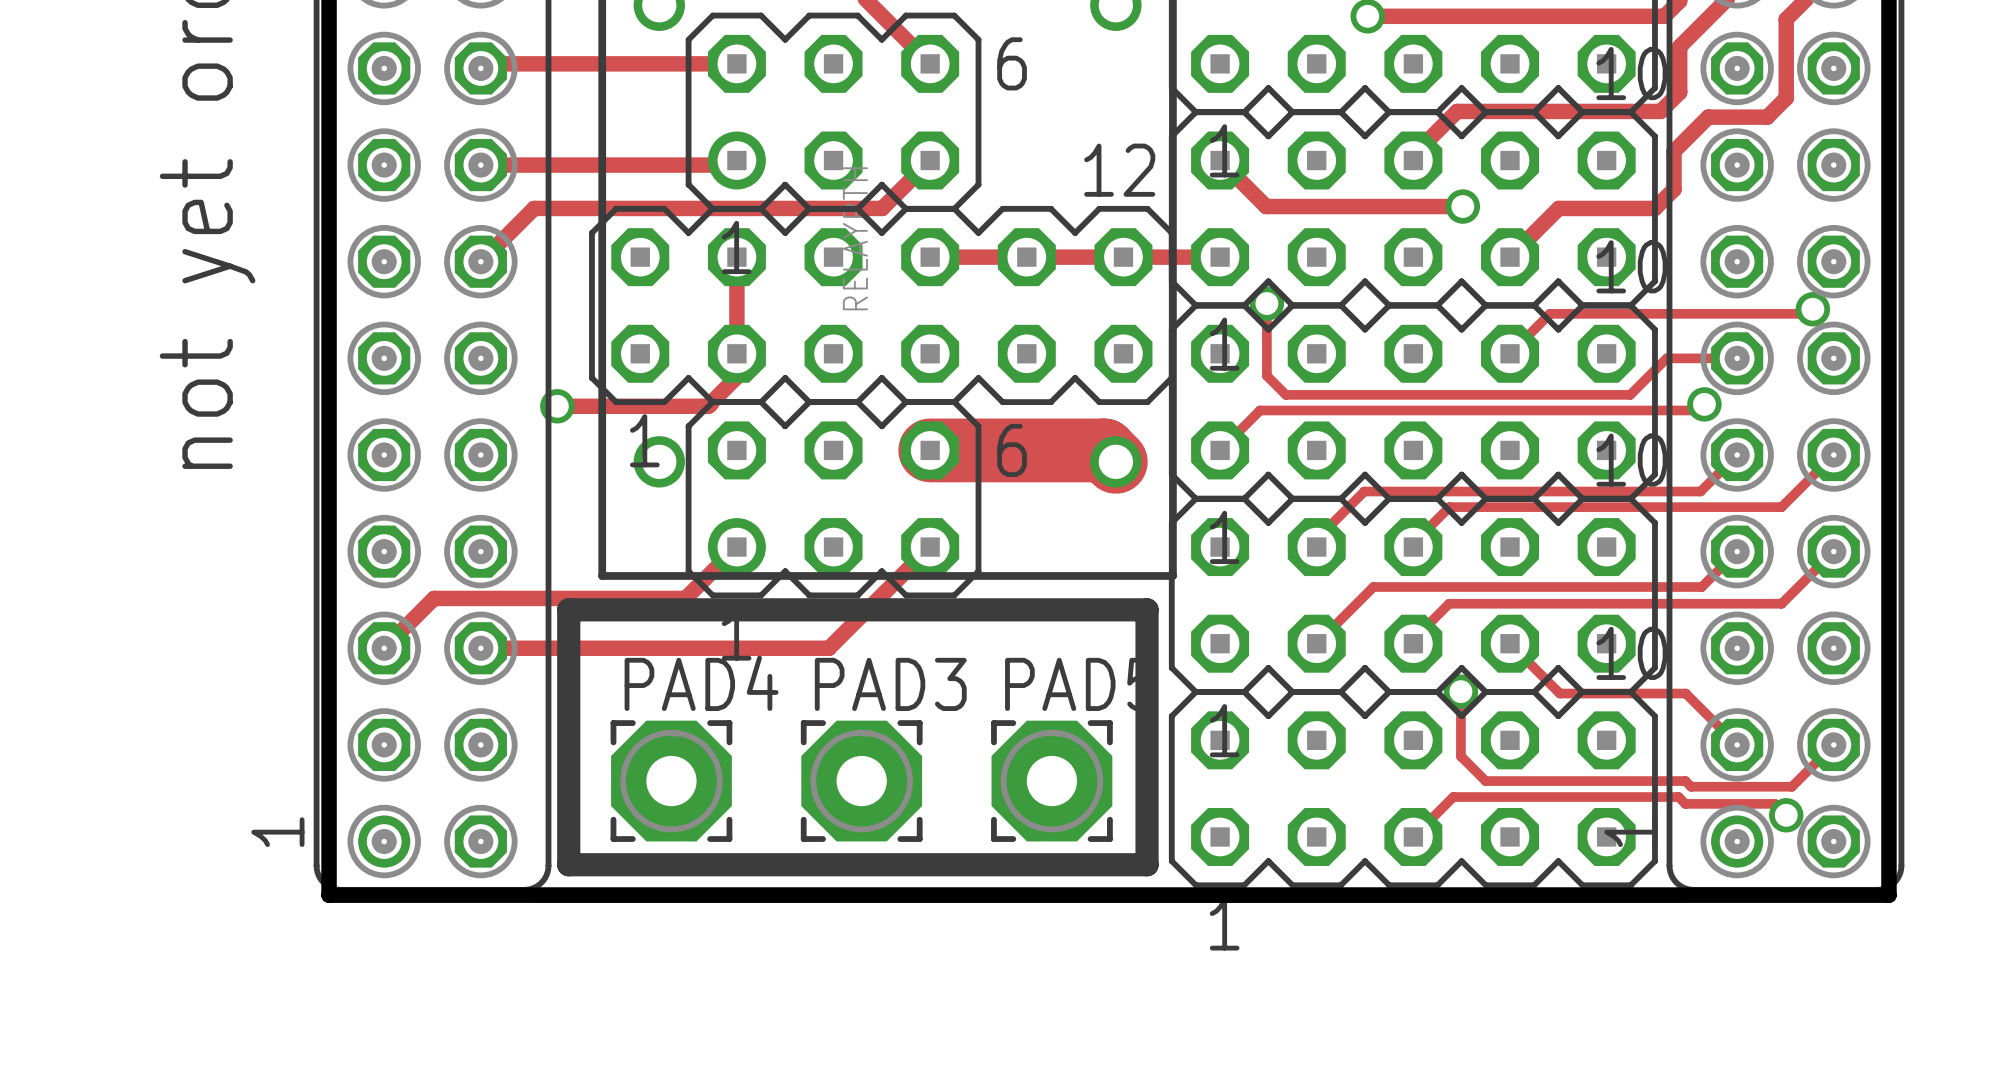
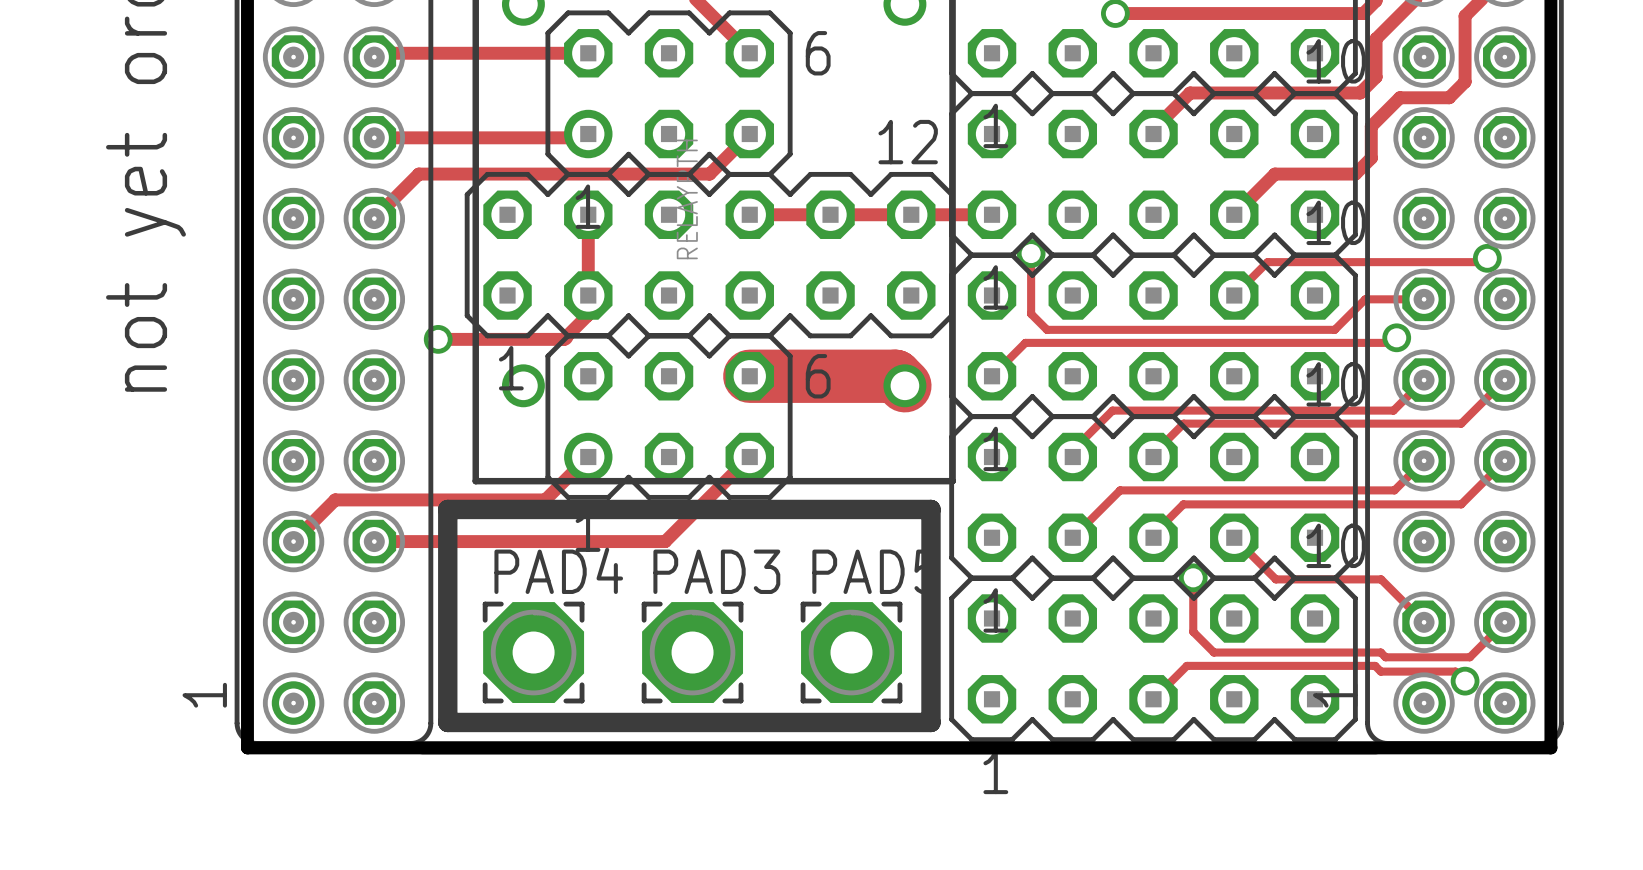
track: (1220, 160) (1266, 206) (1462, 206) -> none
via: (1462, 206) -> none

